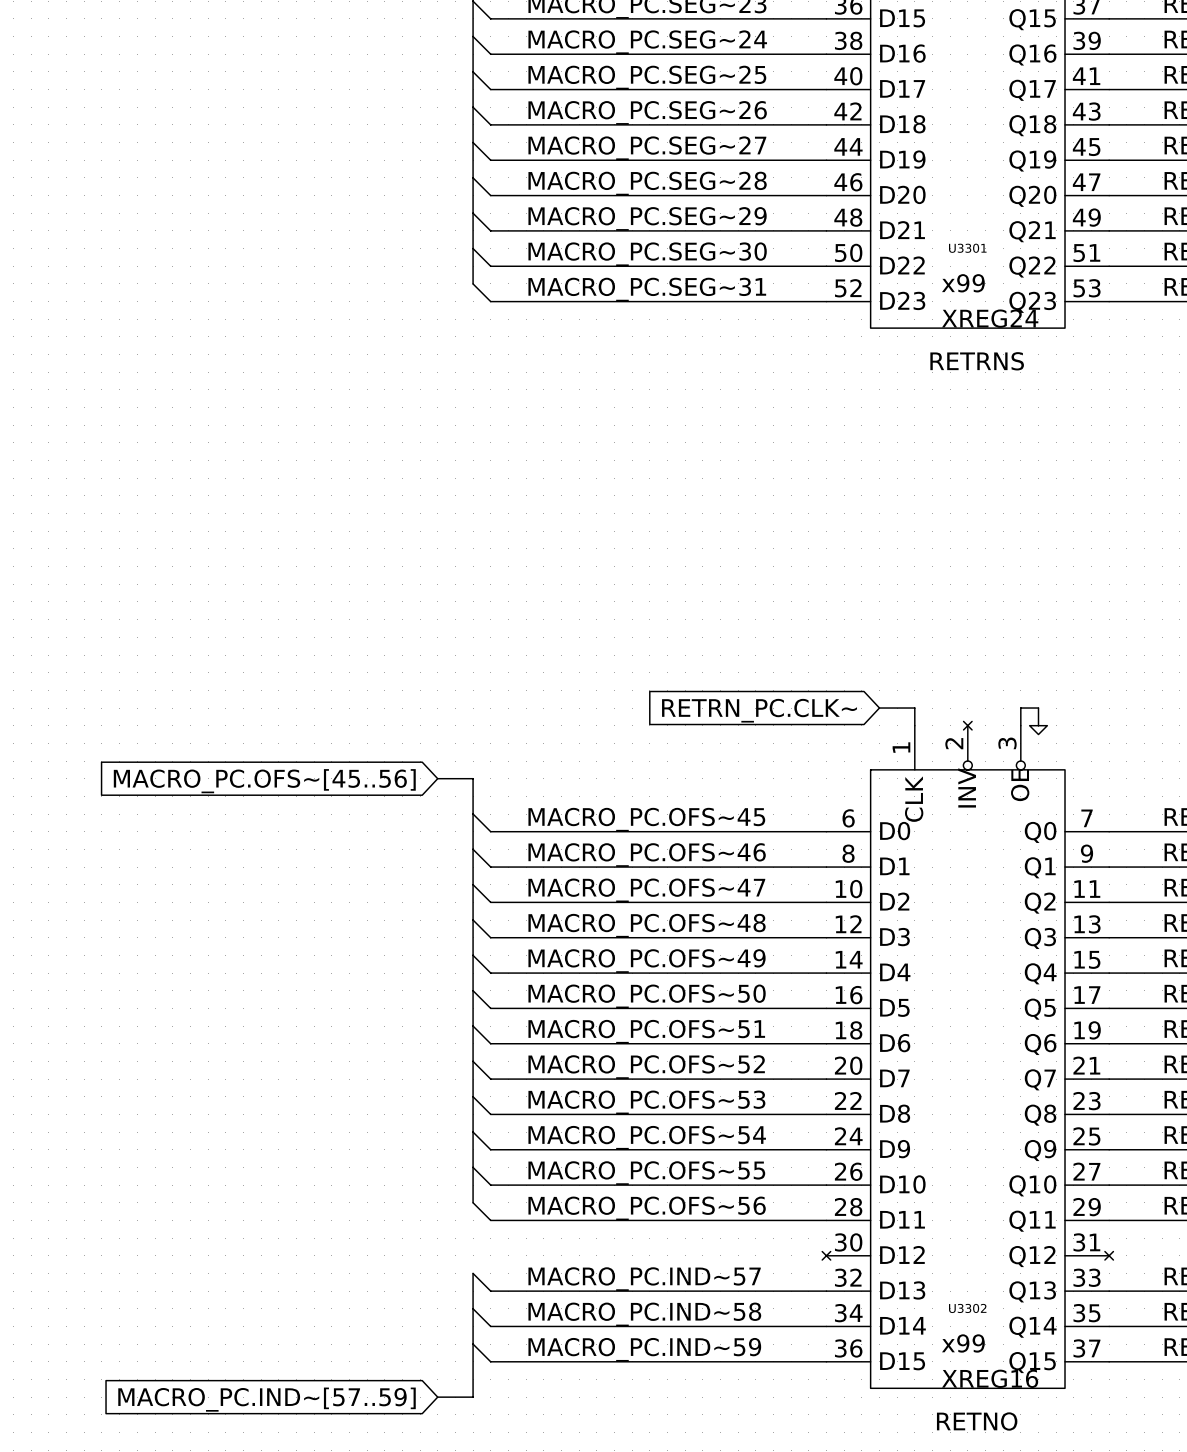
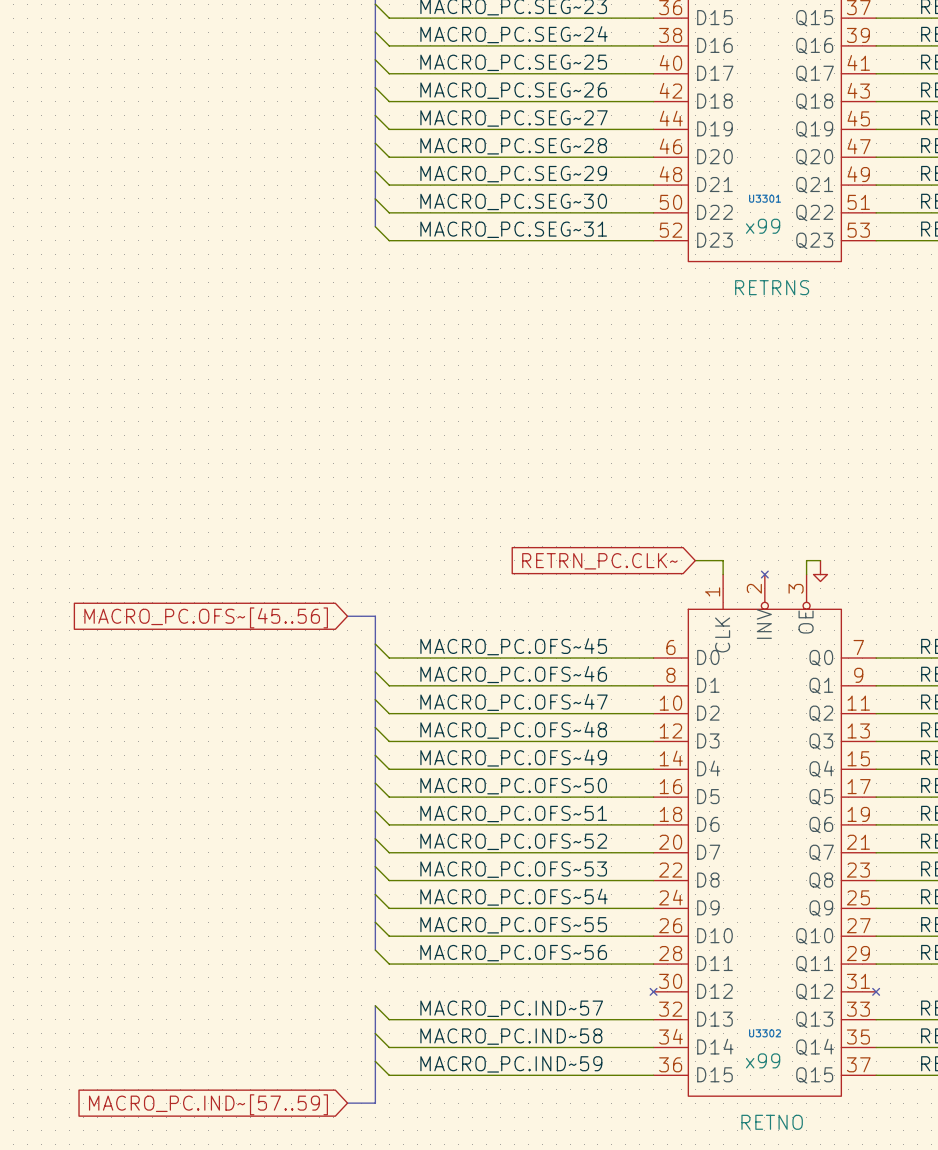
U3301 value: XREG24 (990, 318) -> none
U3302 value: XREG16 (990, 1378) -> none

